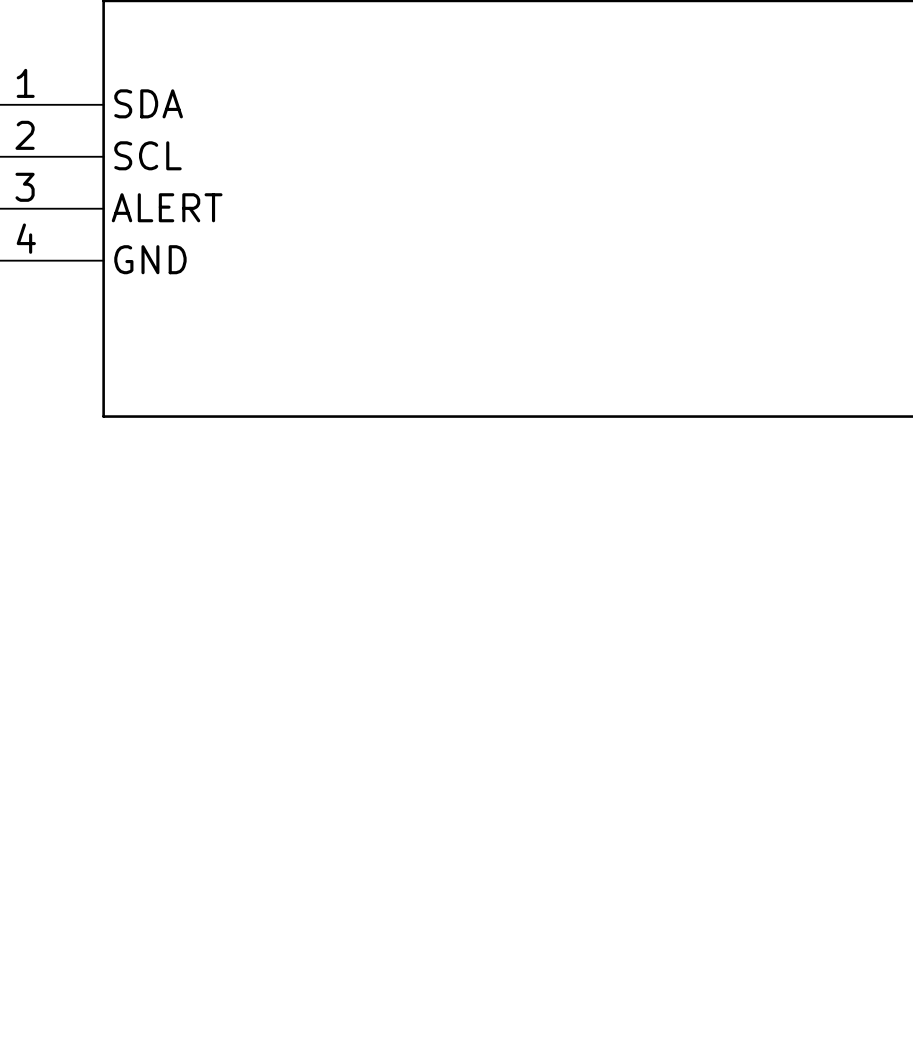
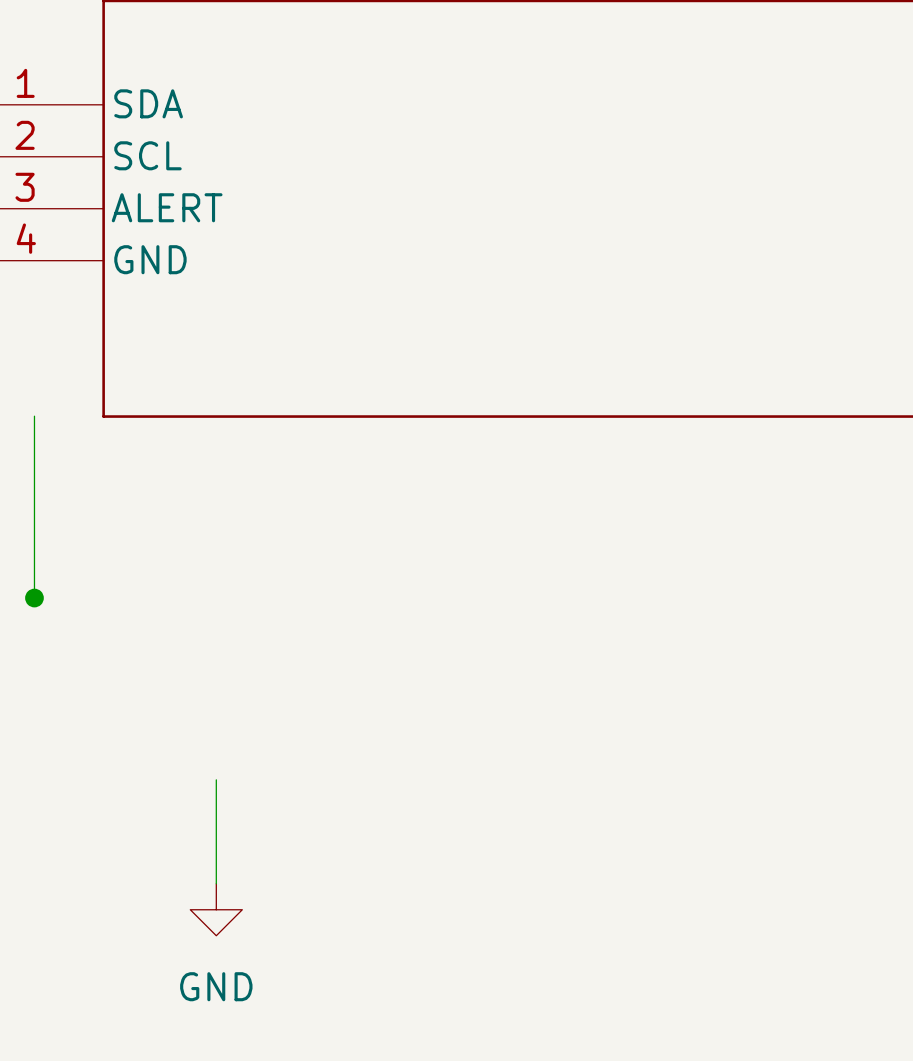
wire: none -> (34, 416) (34, 598)
junction: none -> (34, 598)
wire: none -> (216, 779) (216, 883)
power symbol: none -> GND (216, 909)

